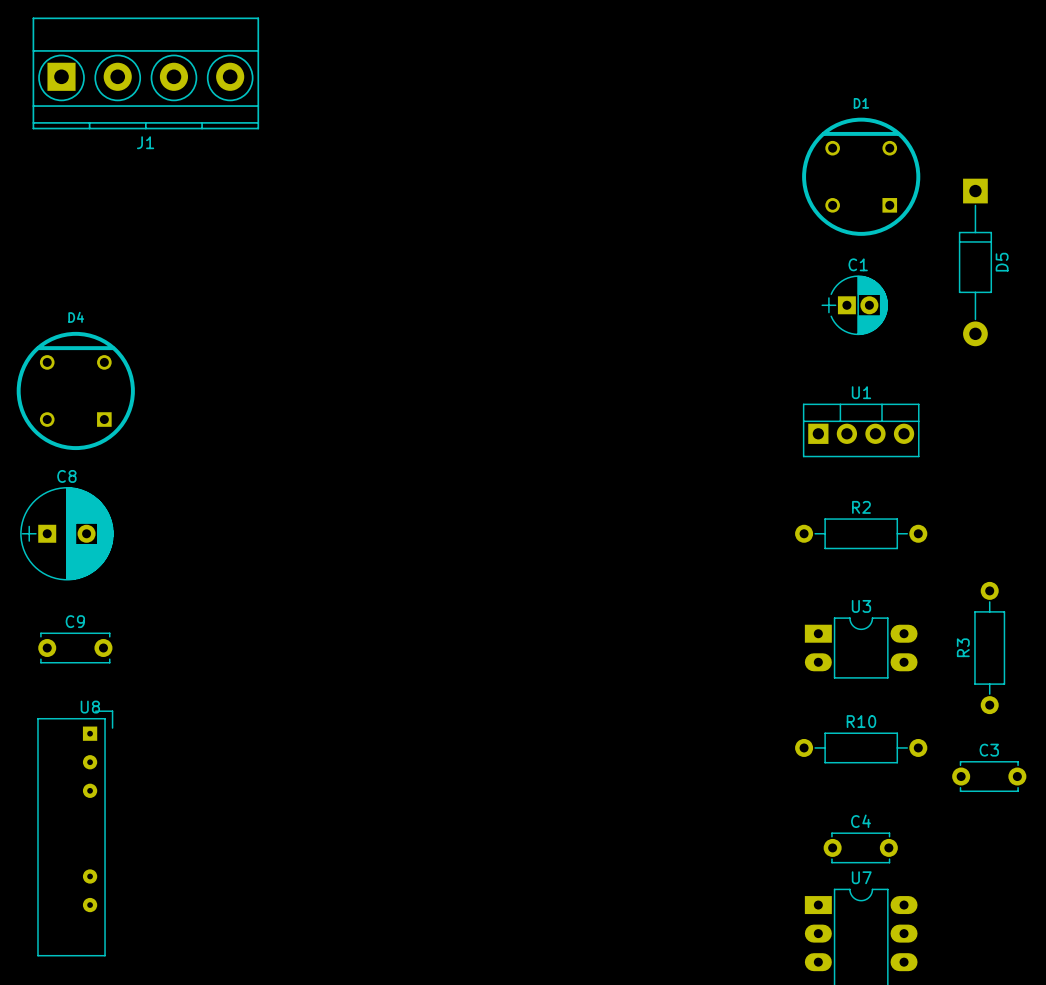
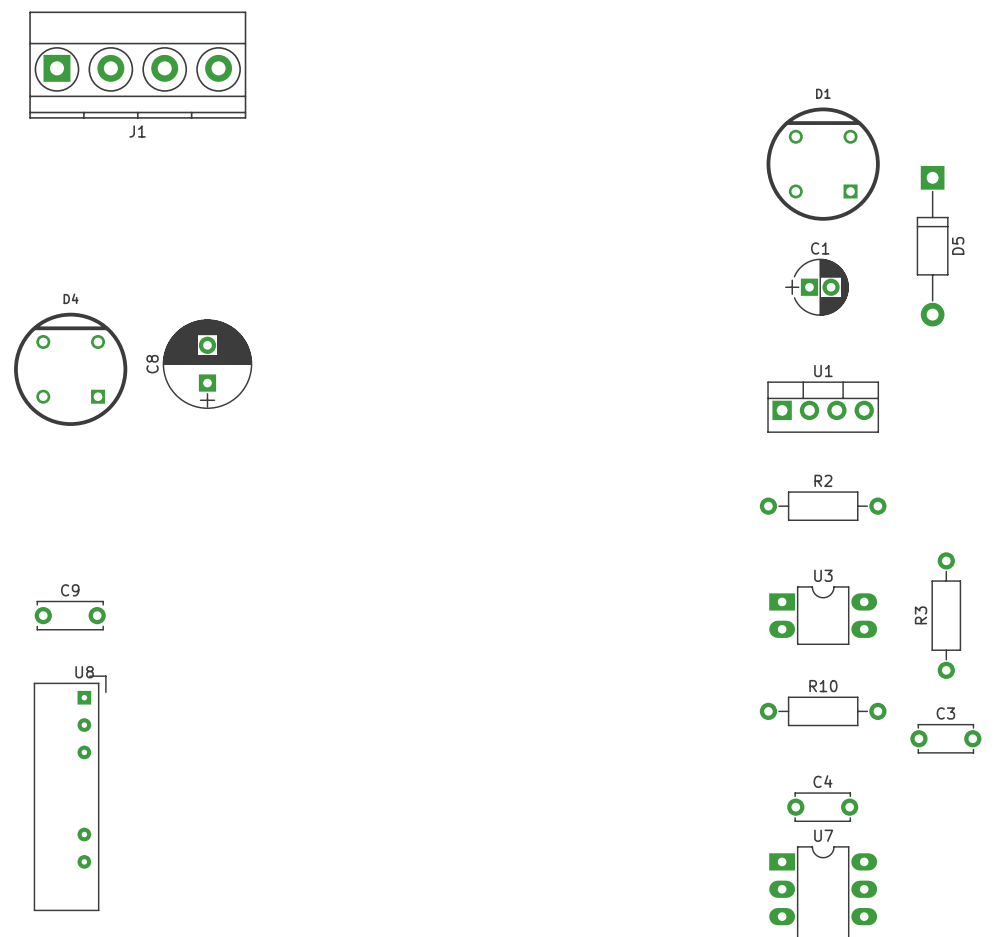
C8 rotation: 0° (66, 533) -> 90° counterclockwise (207, 364)
C8 position: (66, 533) -> (207, 364)

